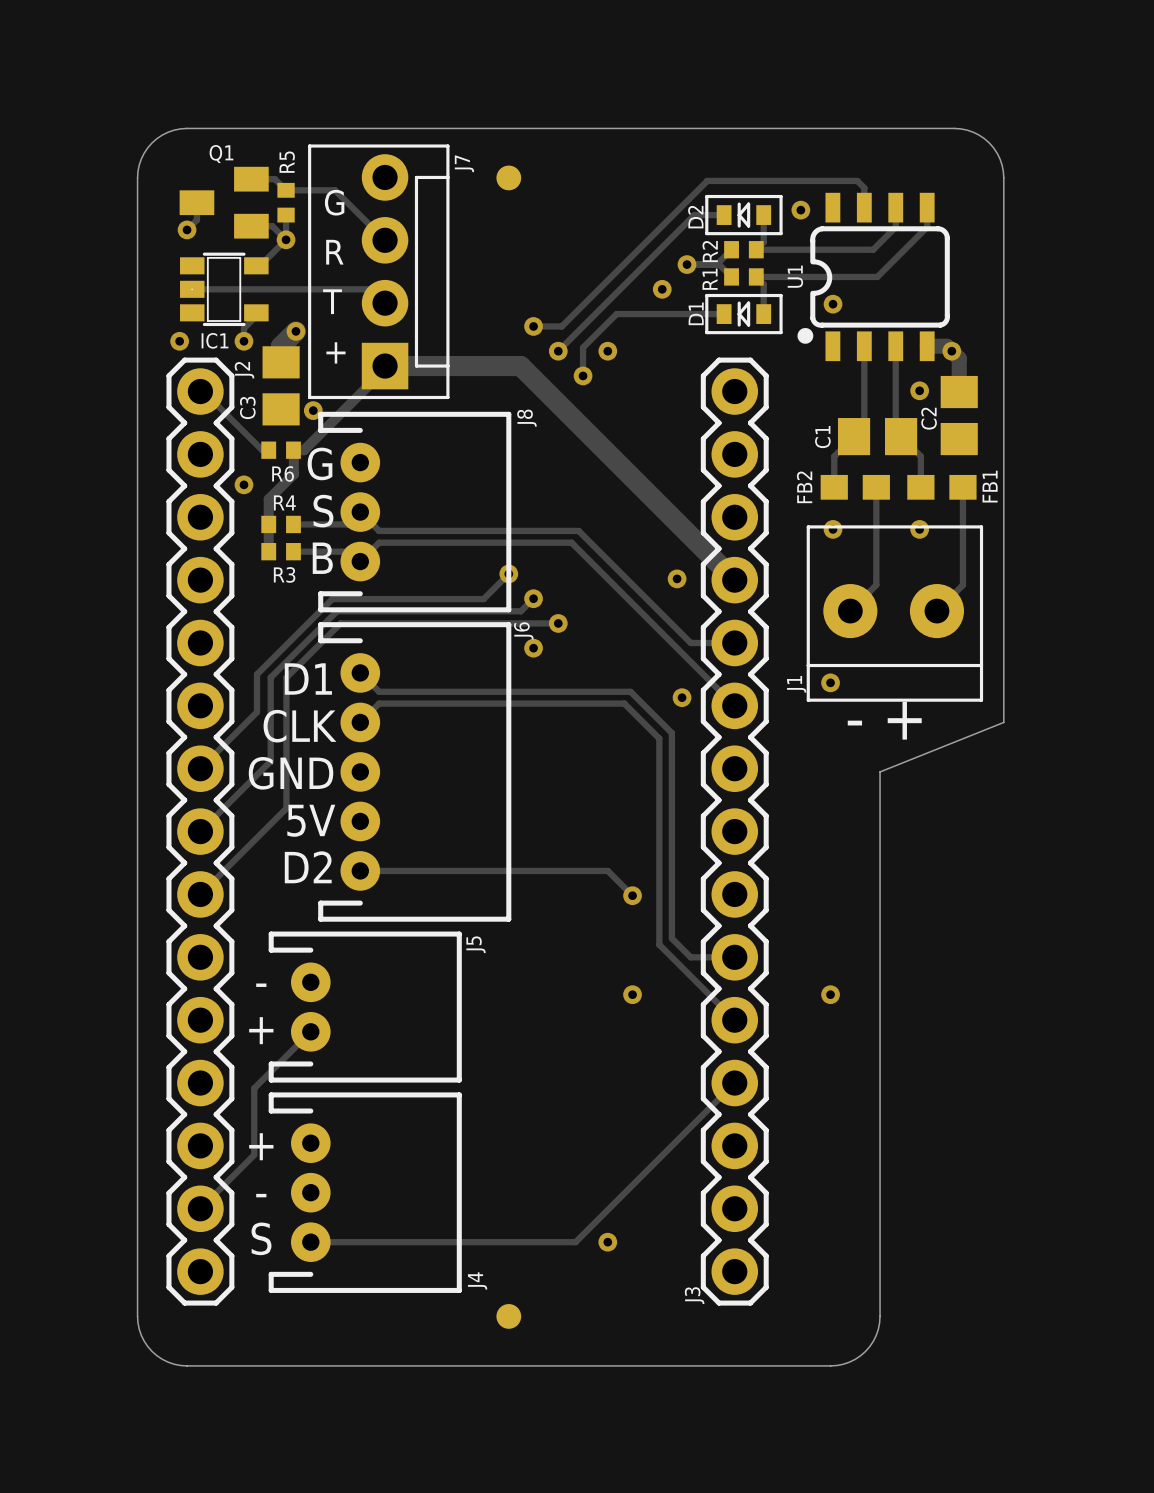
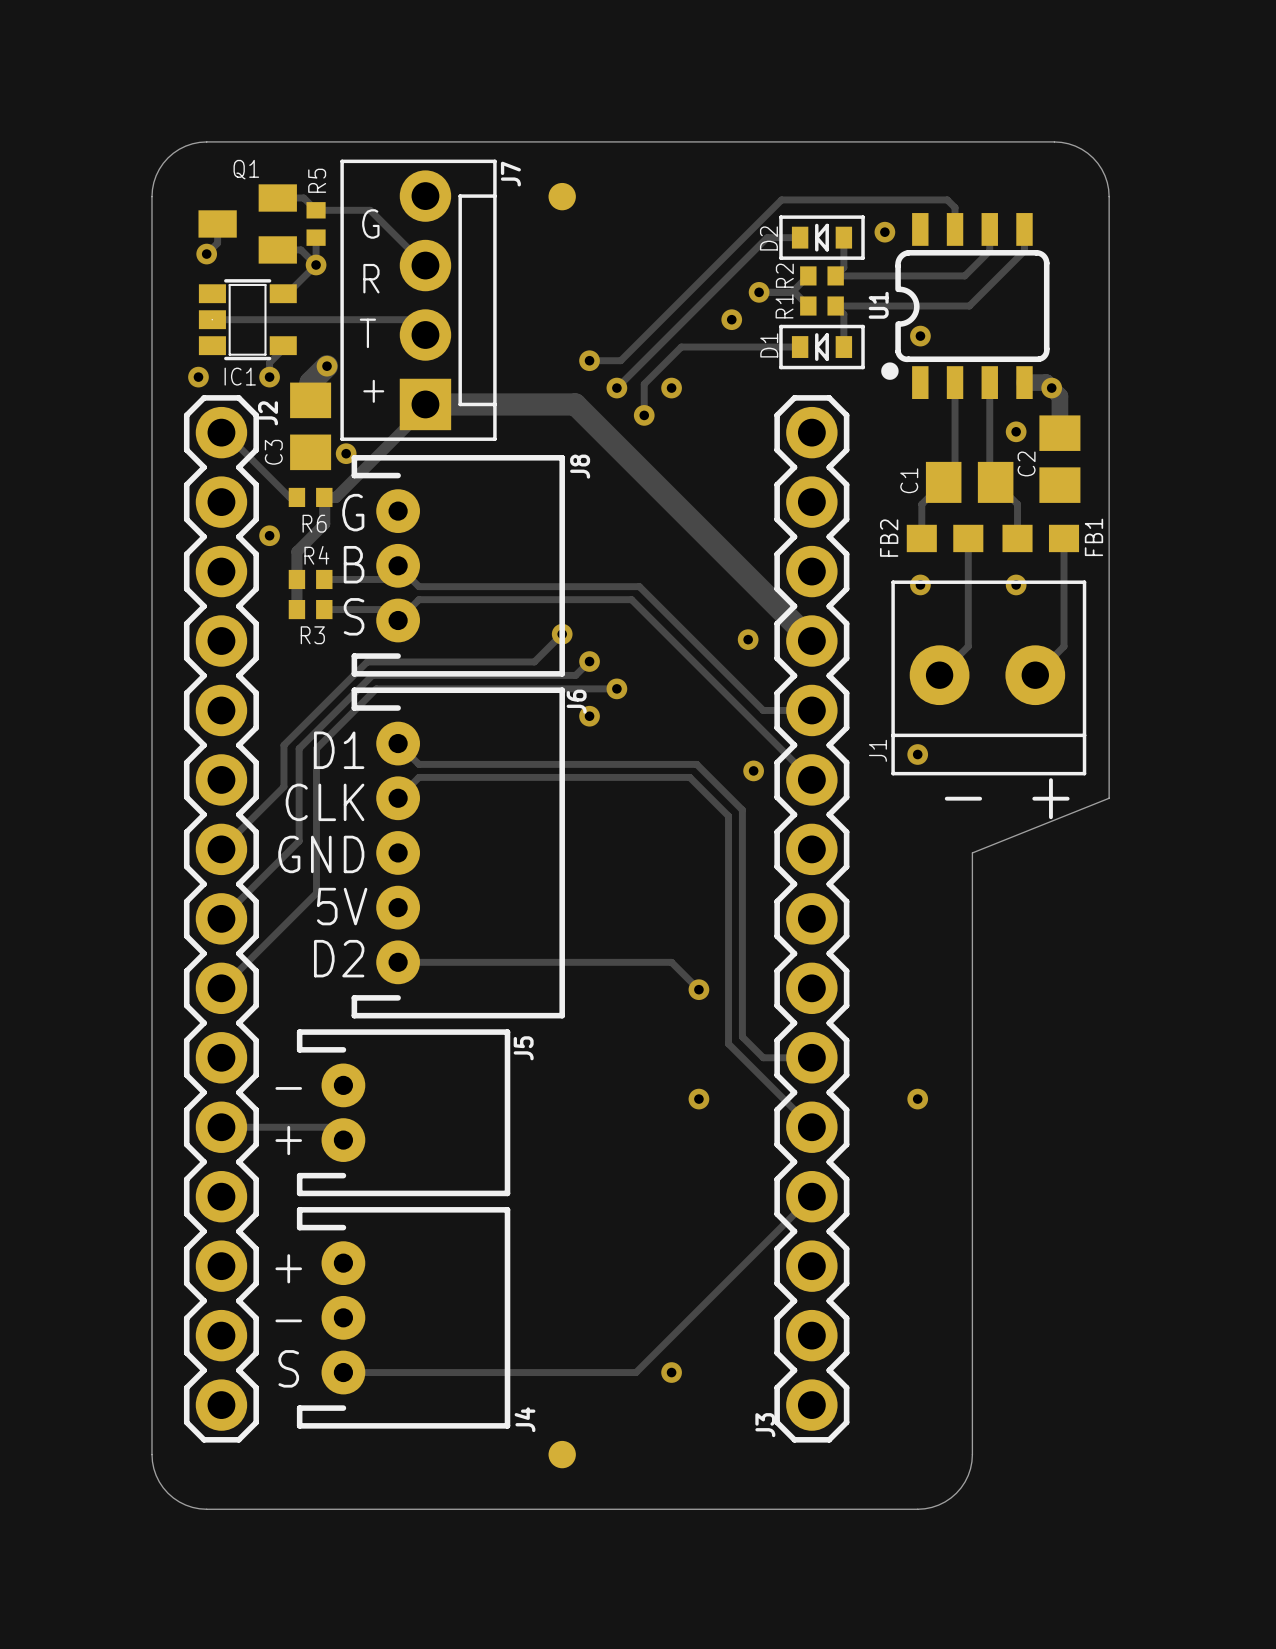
text: S (323, 511) -> B (354, 564)
text: B (322, 558) -> S (354, 616)
track: (310, 1031) (254, 1088) (254, 1154) (200, 1208) -> (343, 1140) (330, 1127) (221, 1127)

